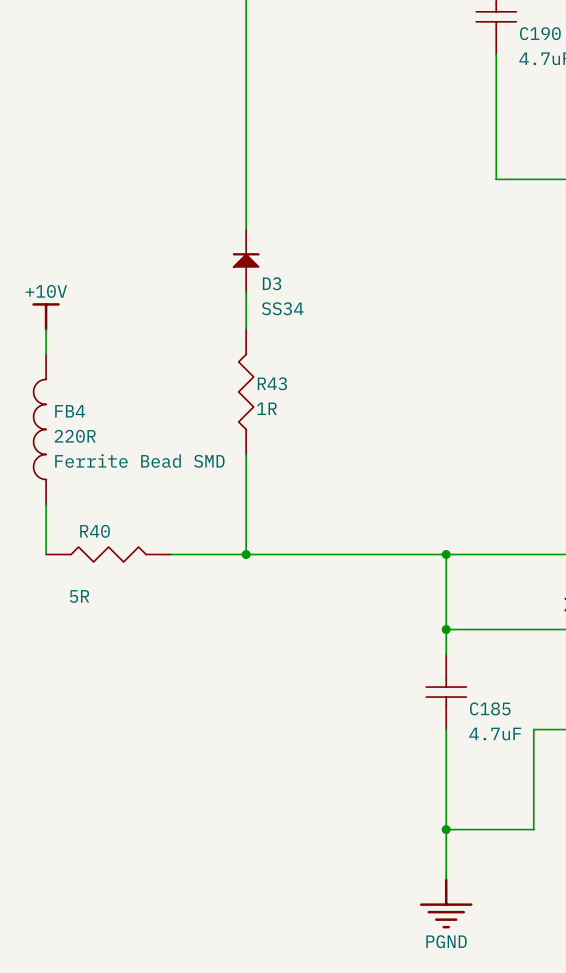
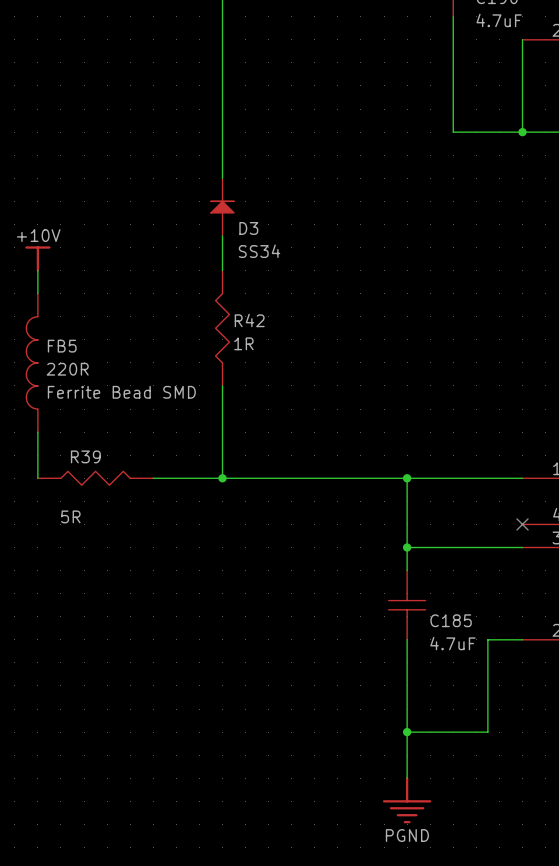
R43 name: R43 (272, 383) -> R42 (249, 320)
FB4 name: FB4 (70, 411) -> FB5 (62, 346)
R40 name: R40 (95, 531) -> R39 (85, 456)

